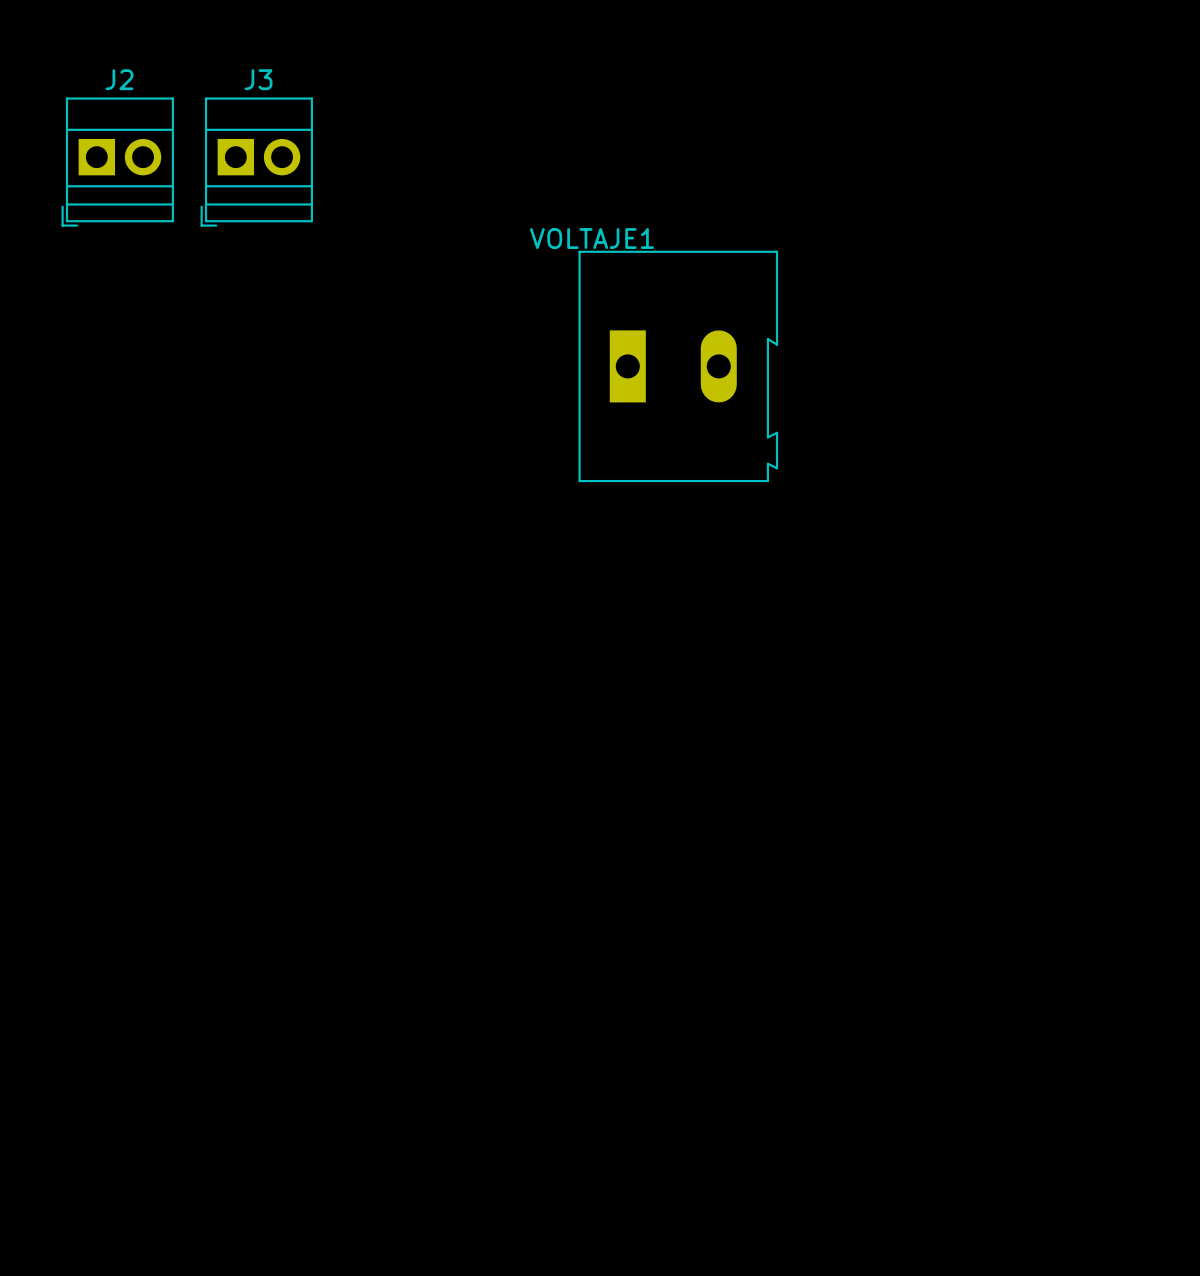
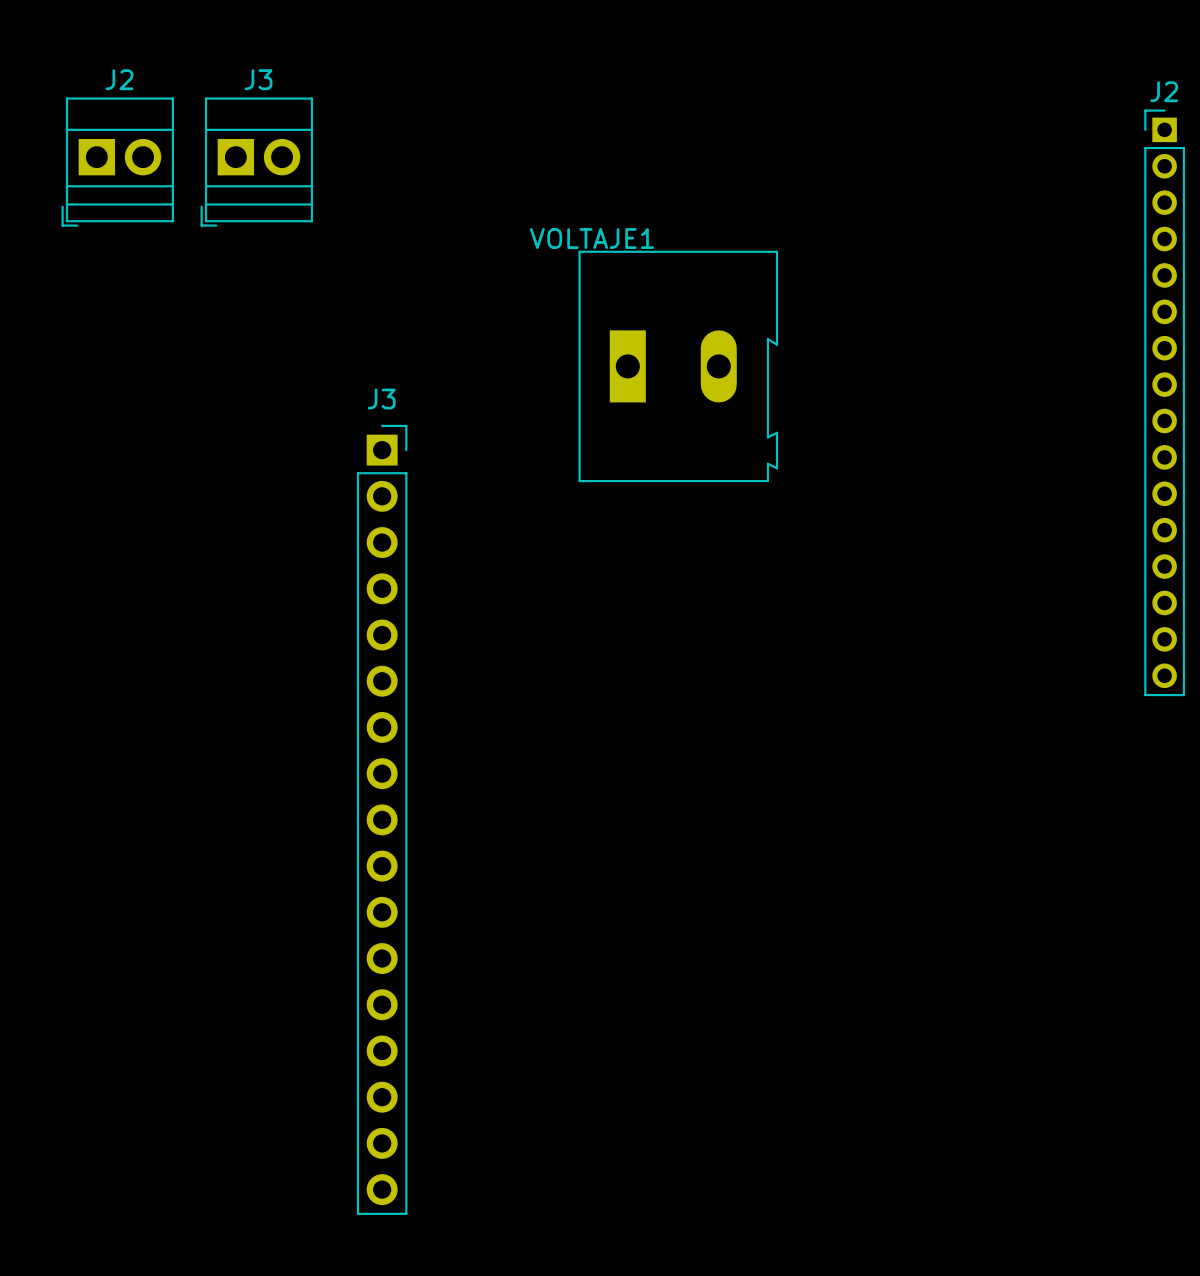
J2: none -> (1164, 402)
J3: none -> (382, 819)

